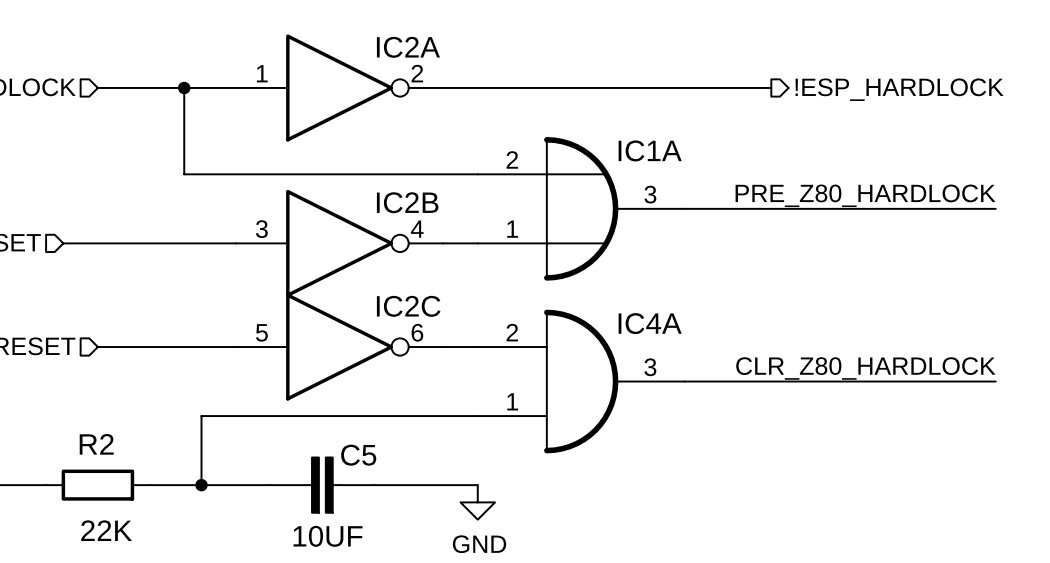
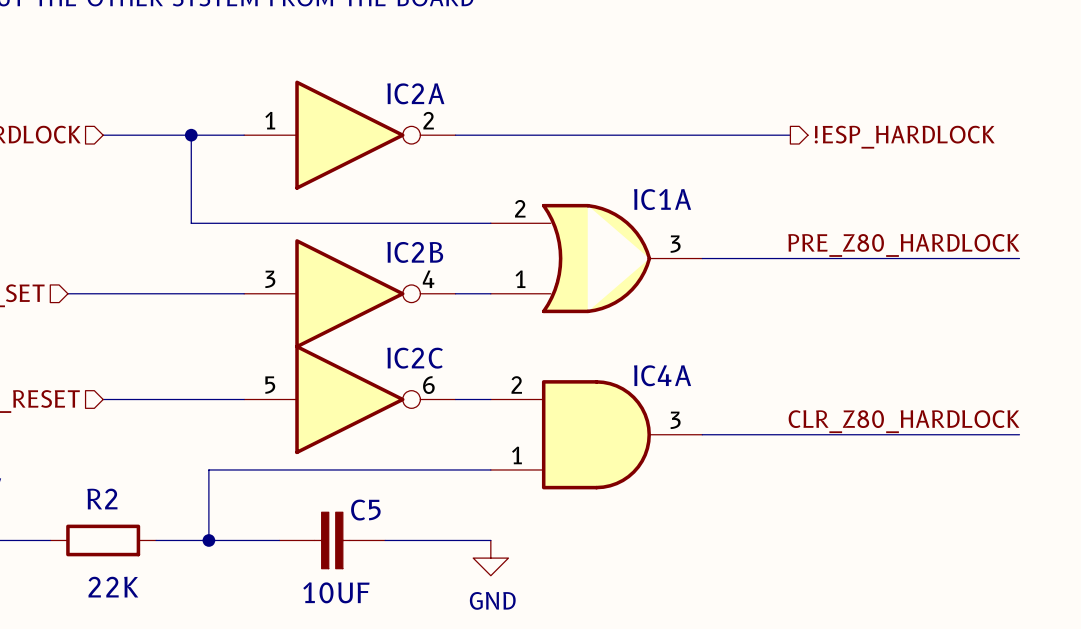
IC1A symbol: [477, 137, 685, 281] -> [490, 203, 703, 314]
IC4A symbol: [477, 309, 685, 454] -> [490, 380, 703, 490]

